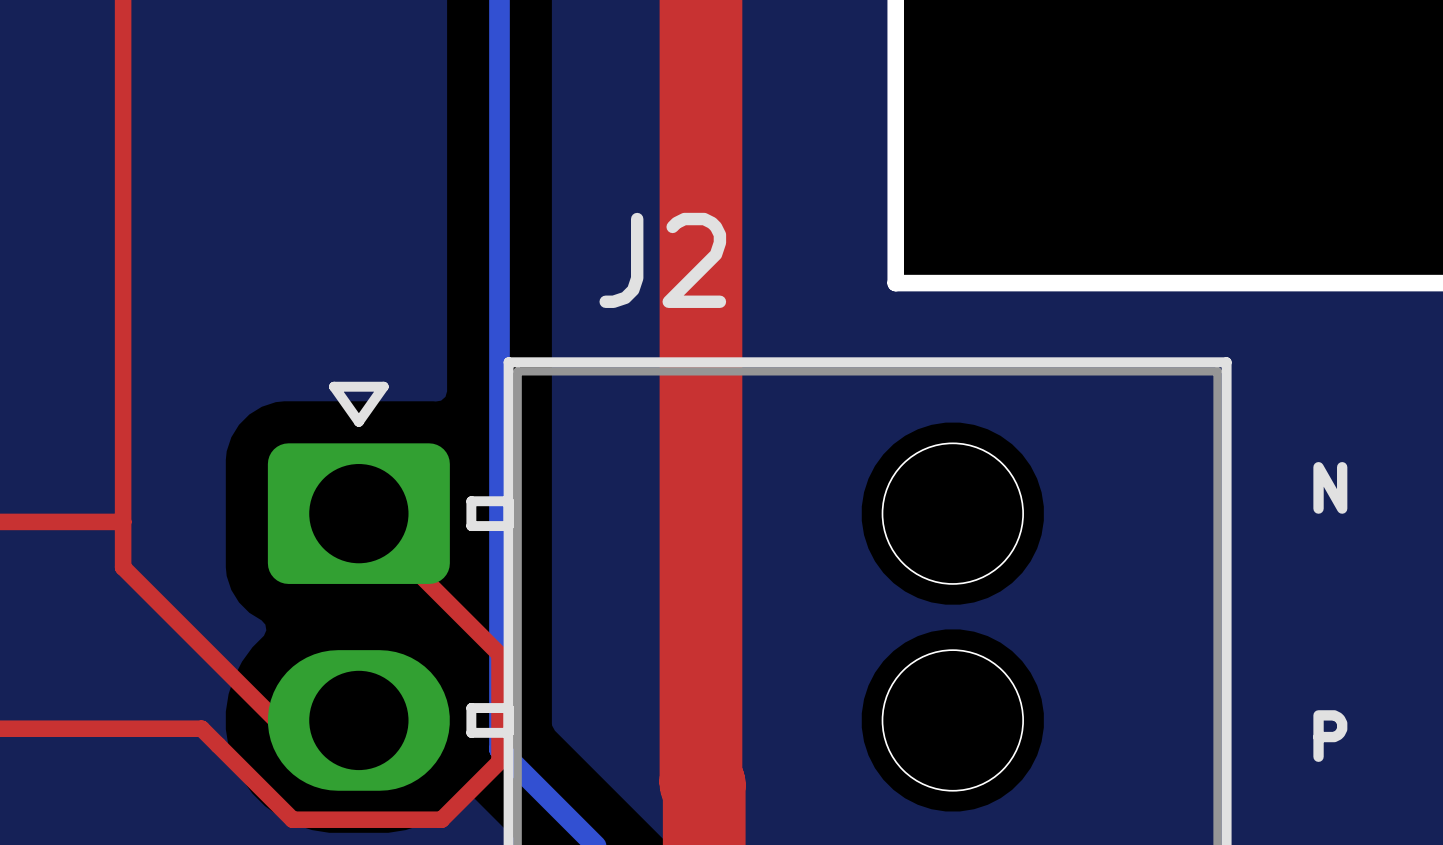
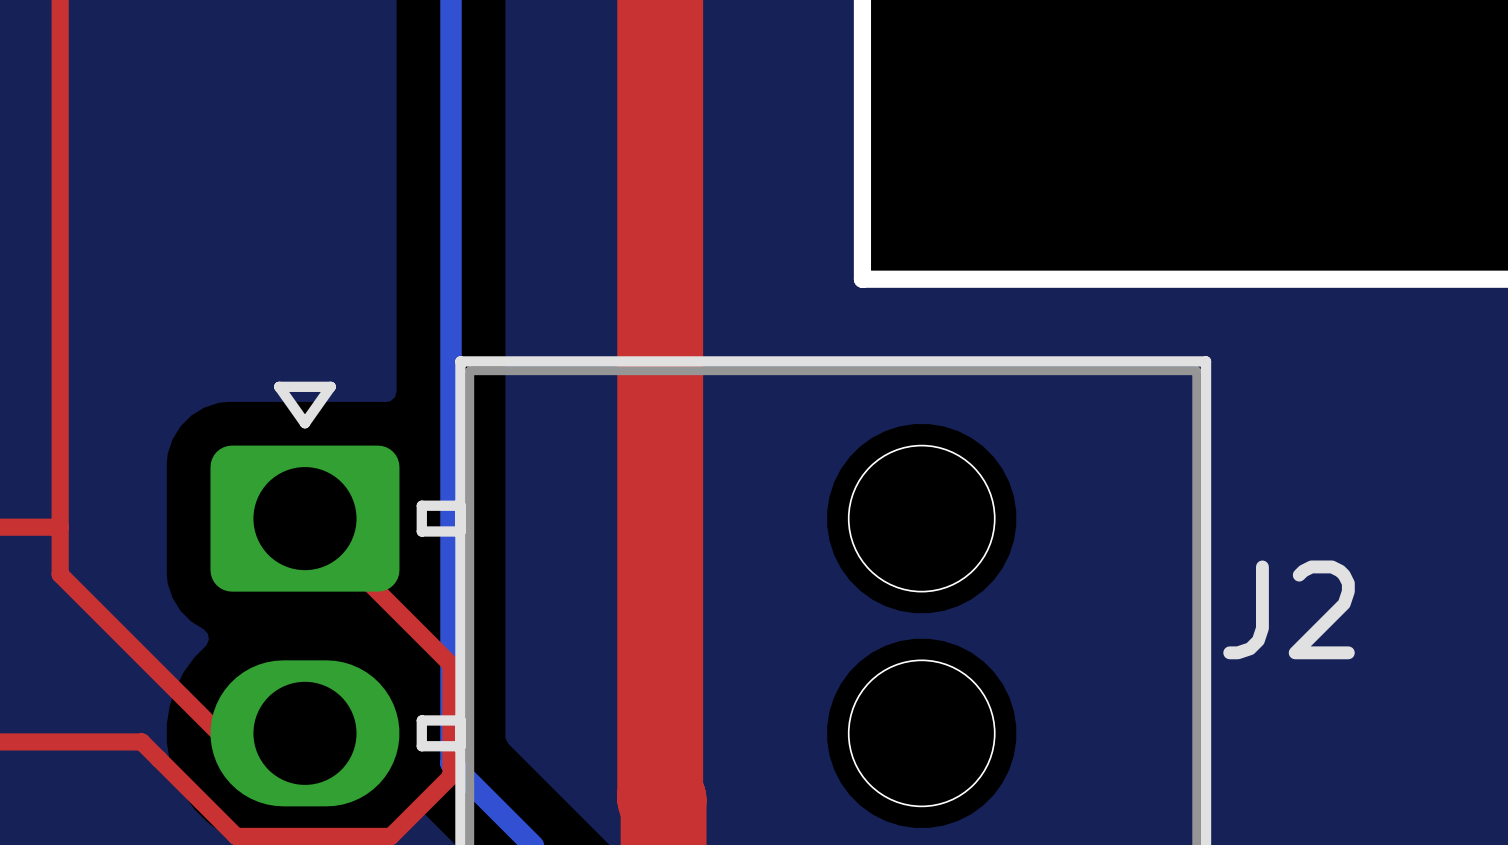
J2 name position: J2 (662, 260) -> J2 (1289, 609)
text: N (1330, 487) -> none
text: P (1330, 736) -> none

